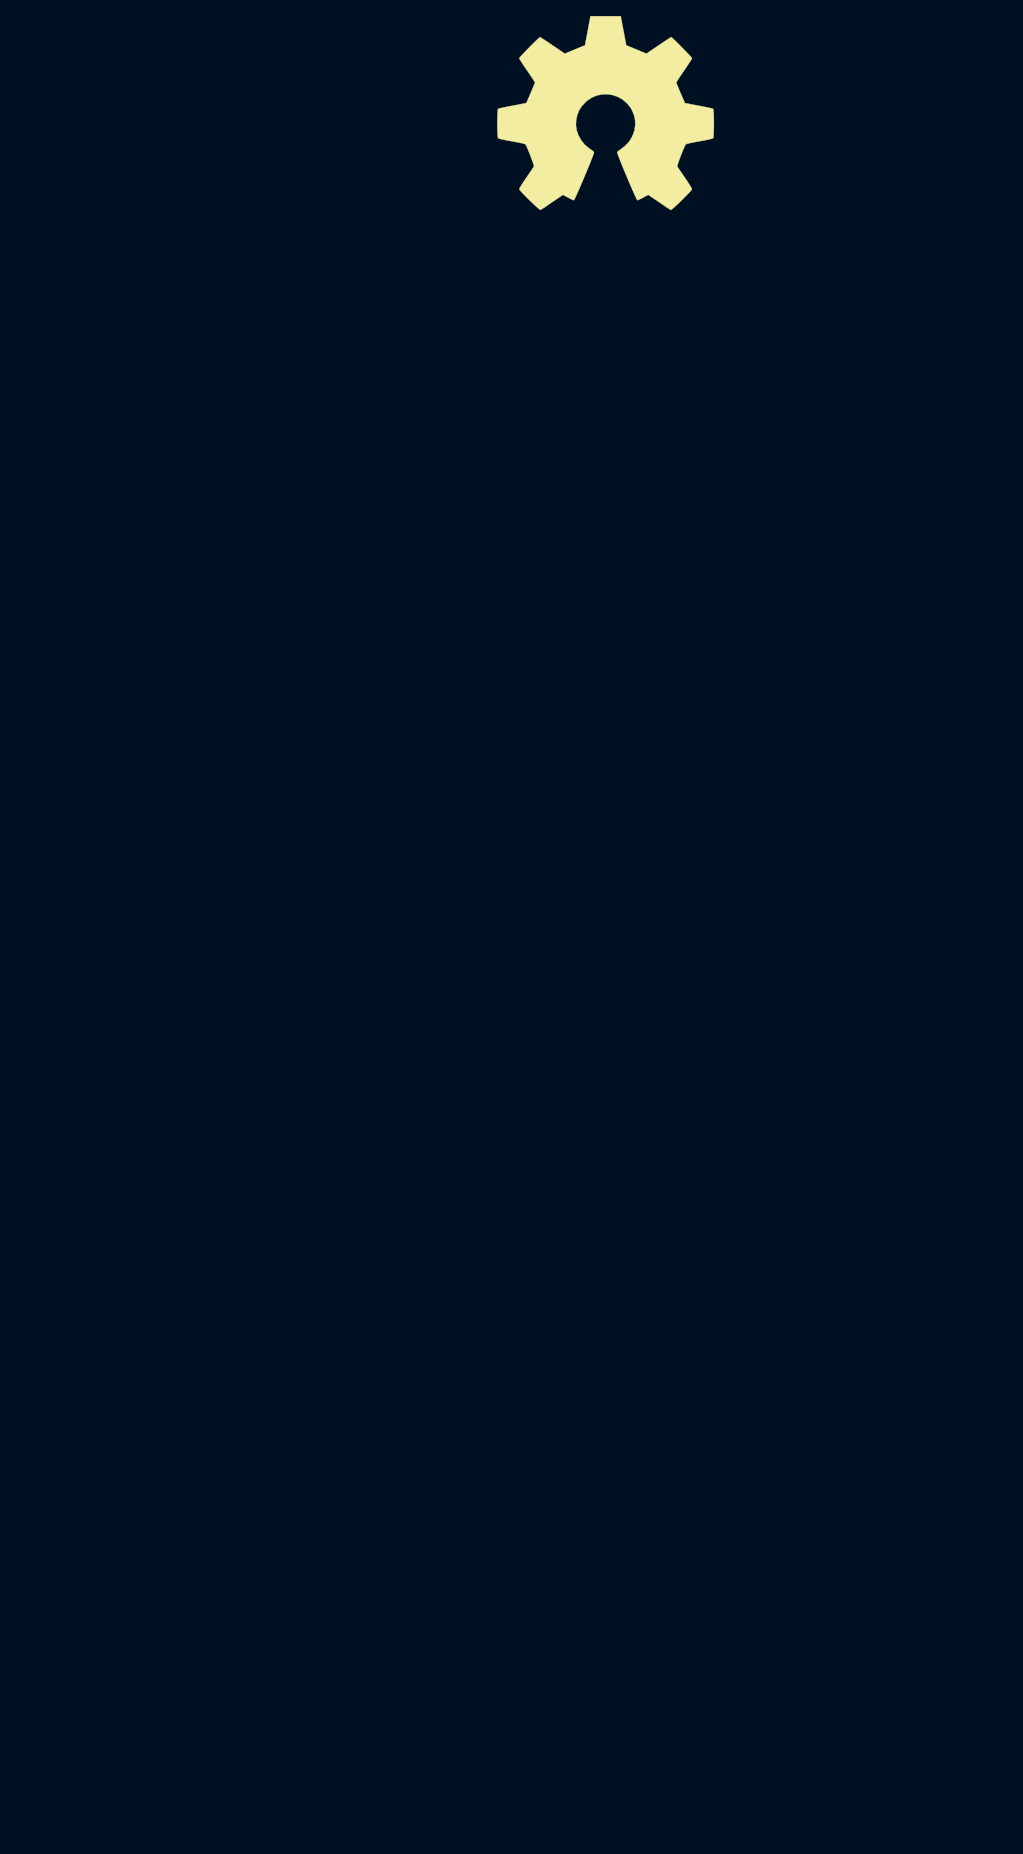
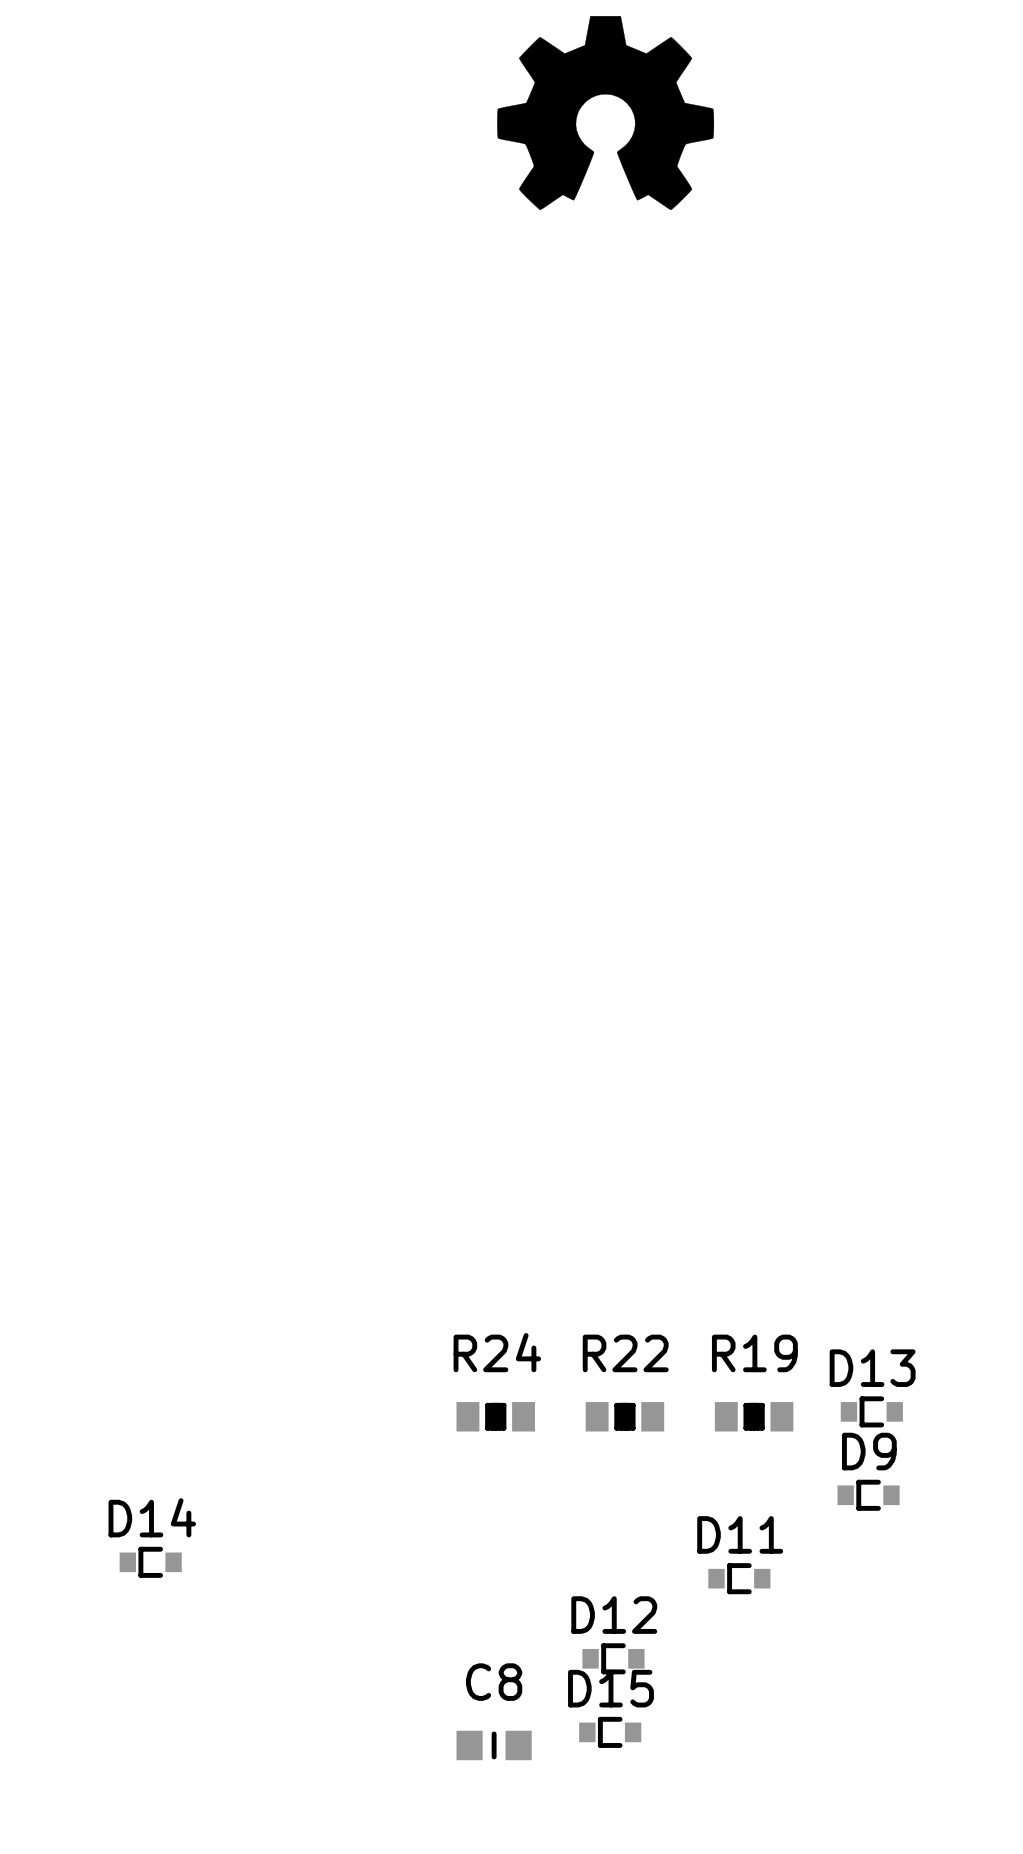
D13: none -> (871, 1411)
R24: none -> (495, 1416)
R22: none -> (624, 1416)
R19: none -> (754, 1416)
D9: none -> (868, 1495)
D14: none -> (150, 1562)
D11: none -> (739, 1578)
D12: none -> (613, 1658)
D15: none -> (610, 1732)
C8: none -> (494, 1745)

